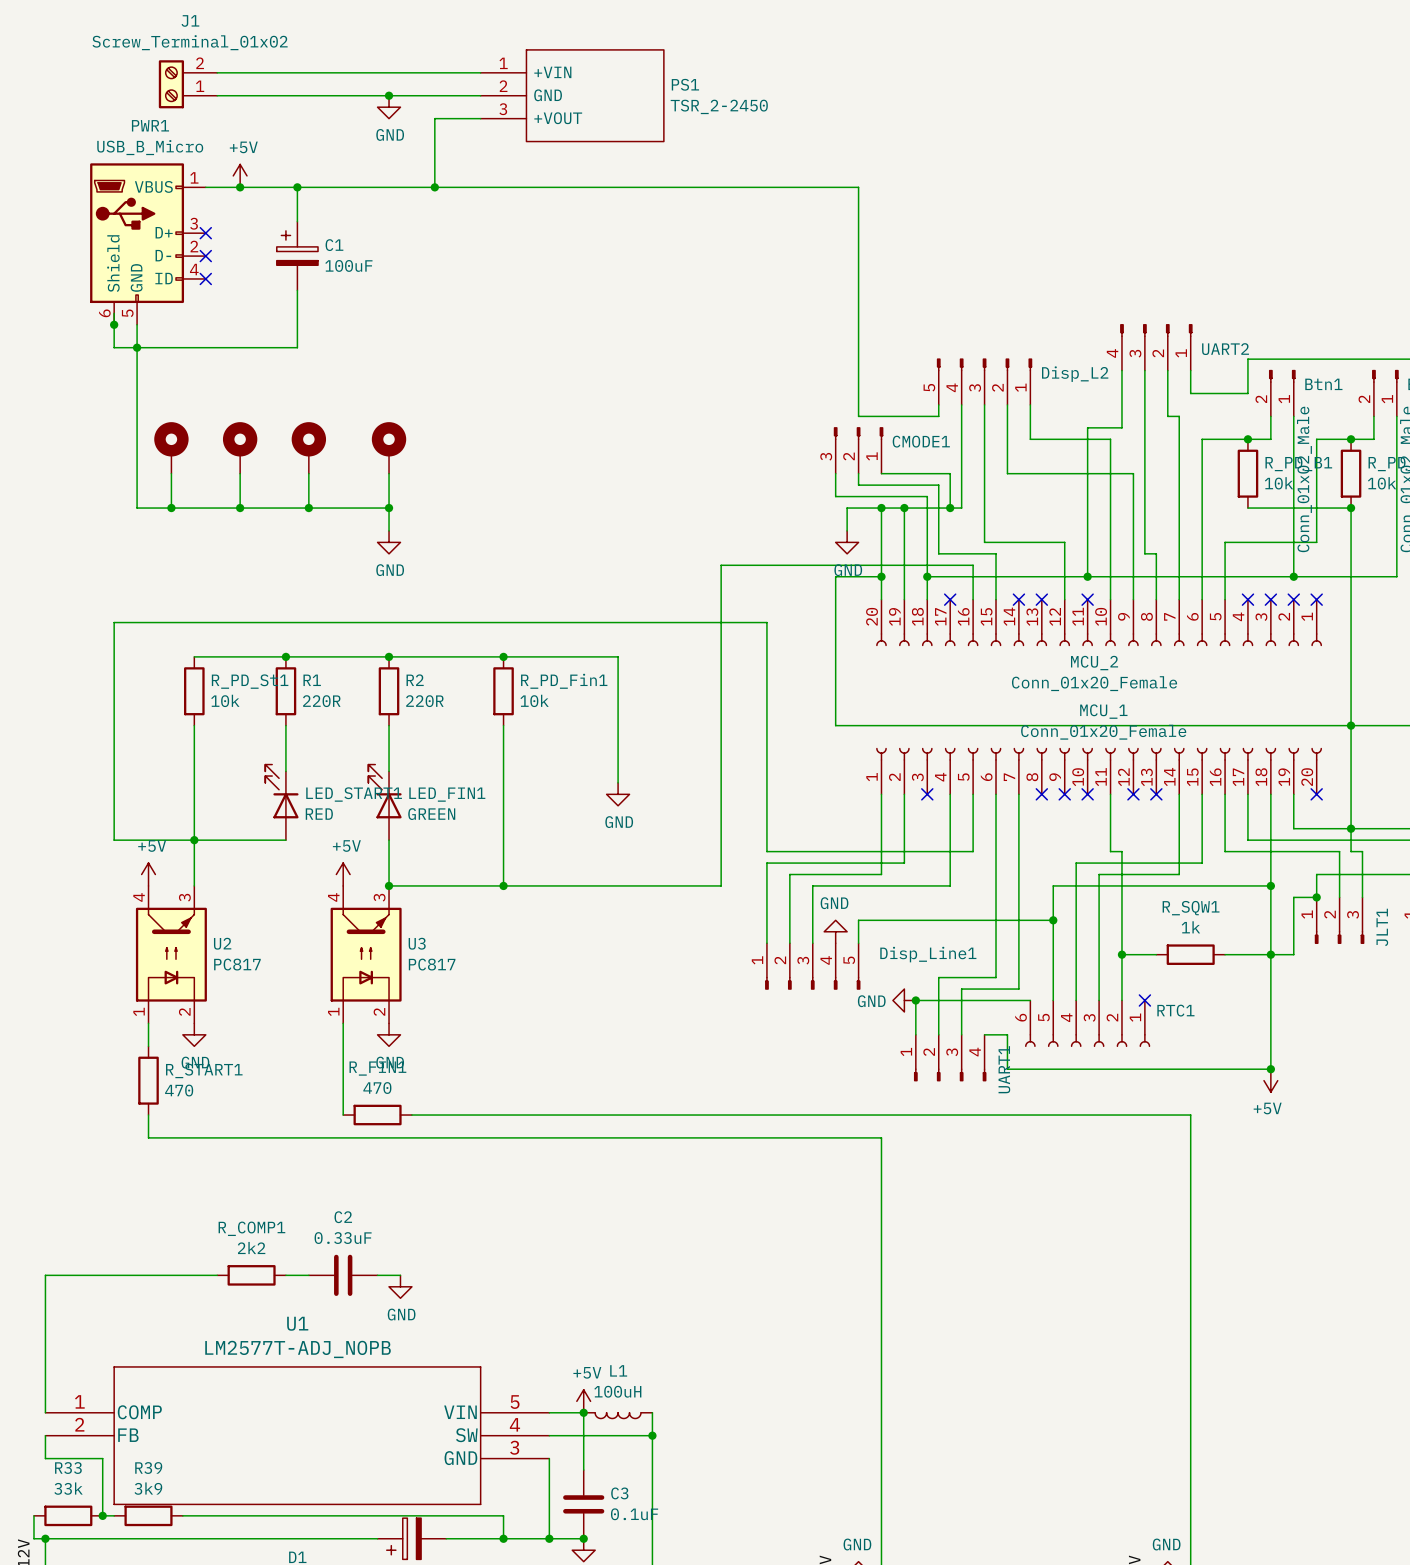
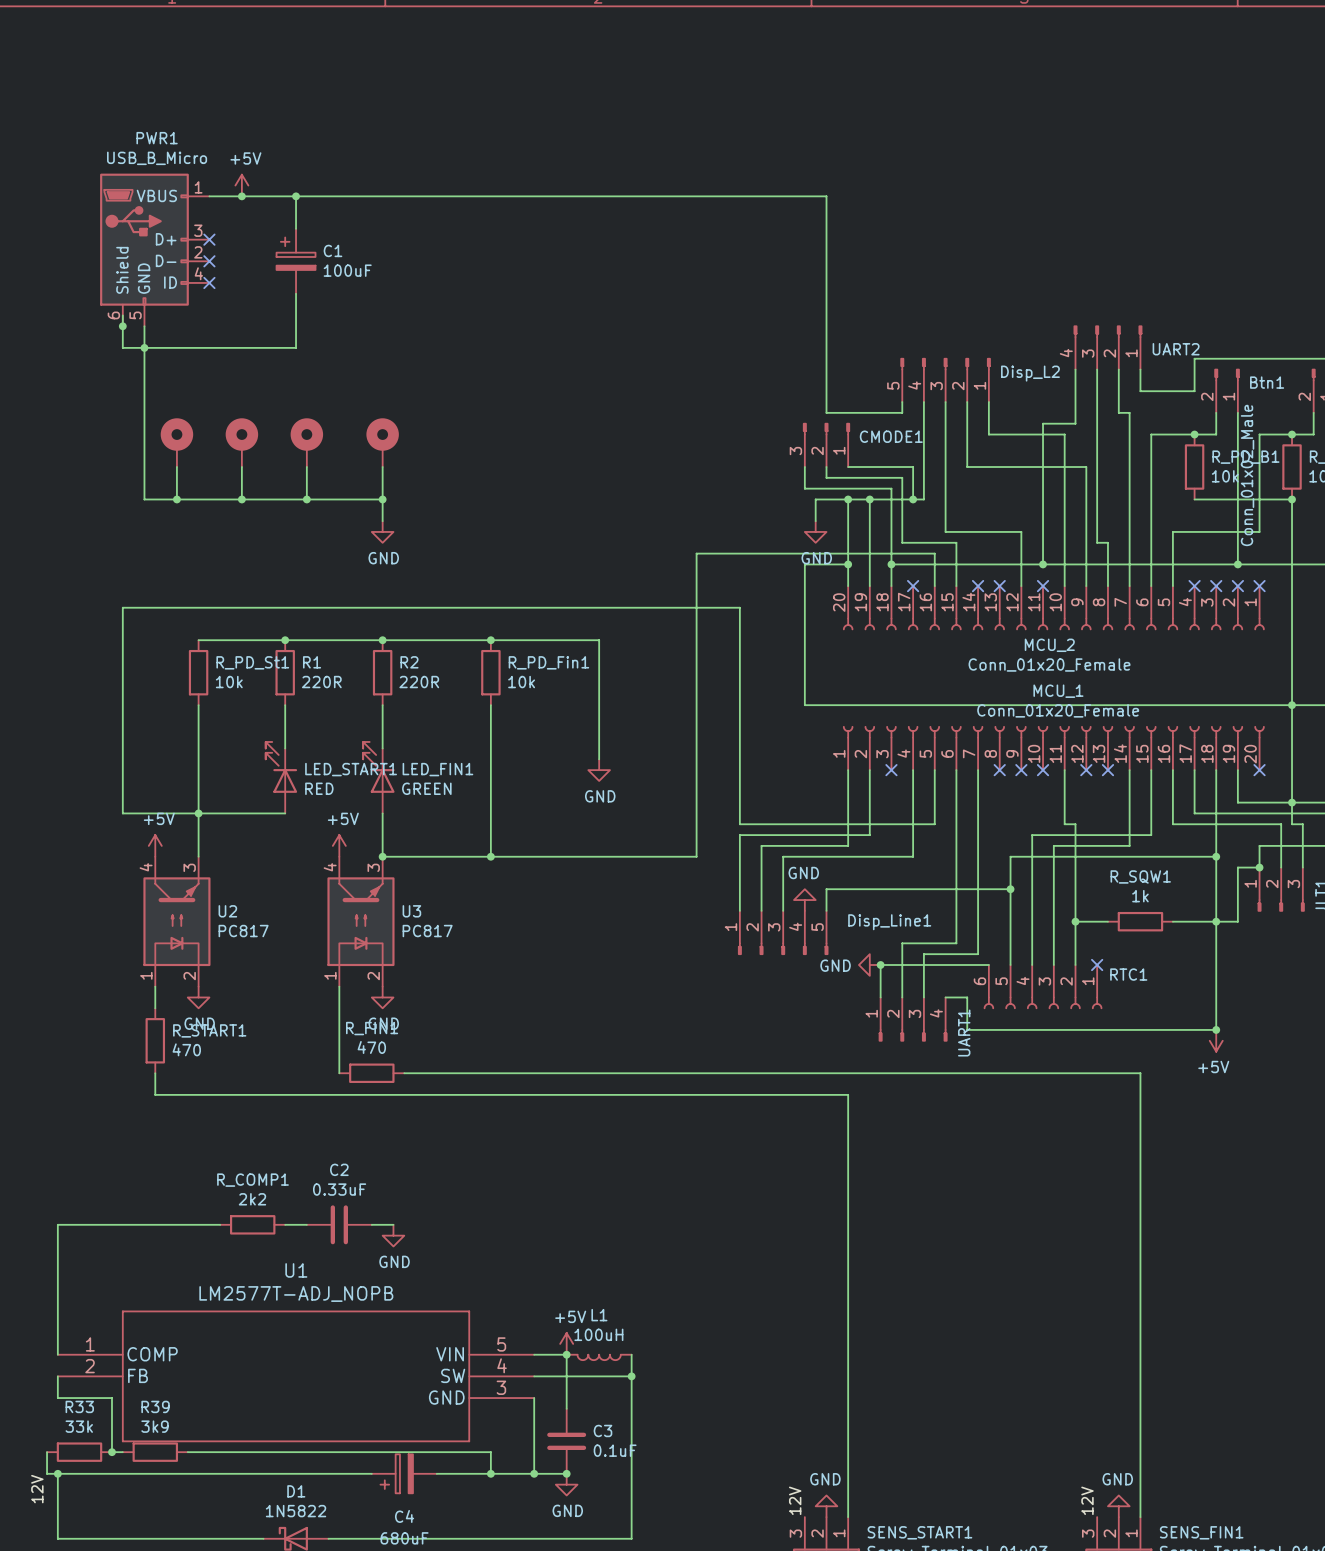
wire: (217, 72) (480, 72) -> none
J1: Screw_Terminal_01x02 (188, 84) -> none
wire: (217, 95) (480, 95) -> none
junction: (389, 95) -> none
PS1: TSR_2-2450 (572, 95) -> none
power symbol: GND (389, 107) -> none
wire: (480, 118) (434, 118) (434, 187) -> none
junction: (434, 187) -> none

